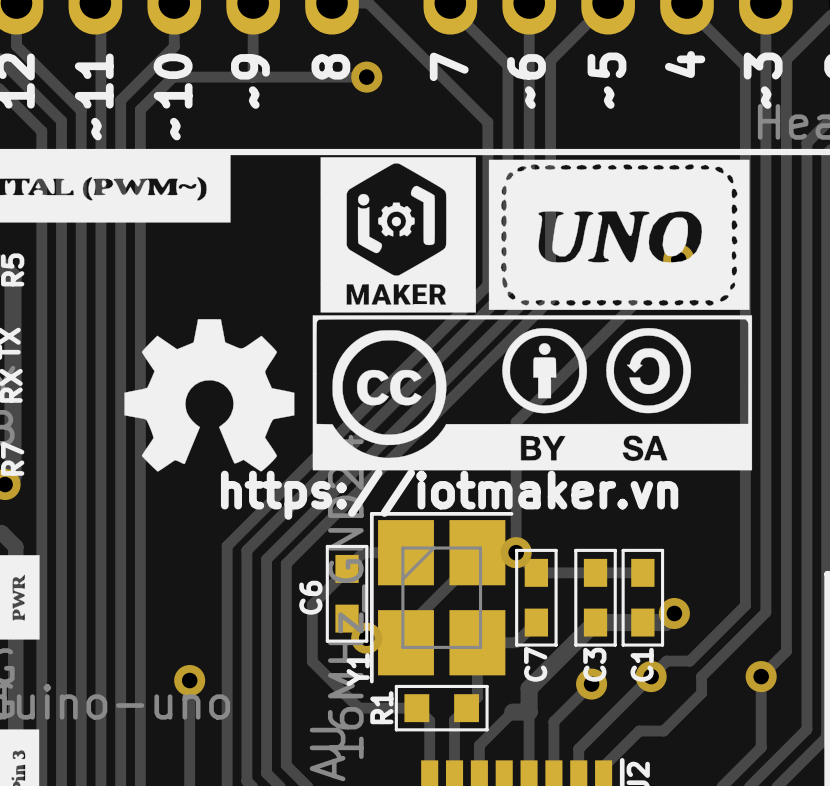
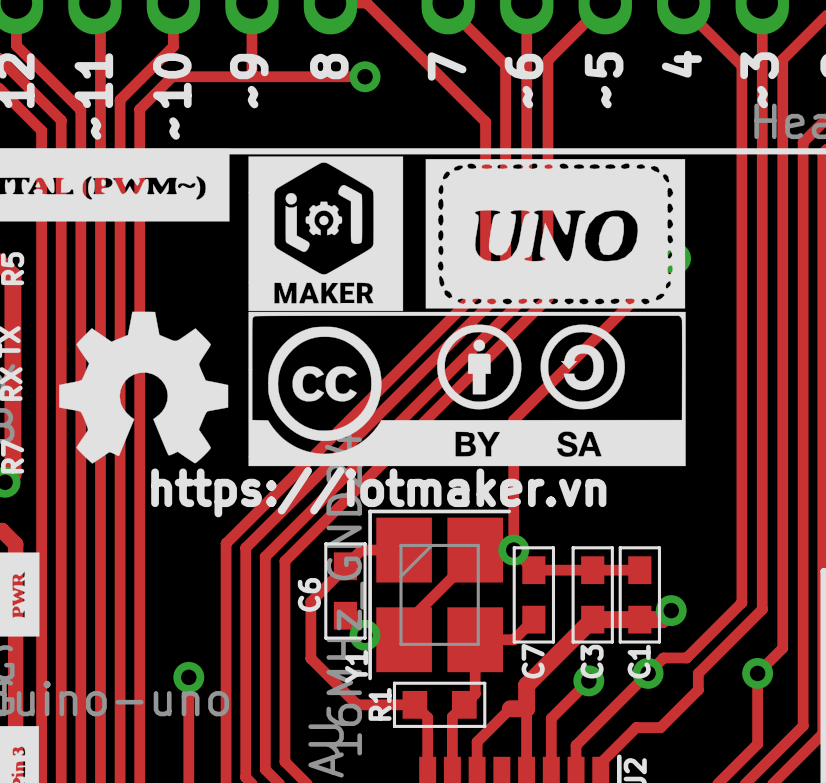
drawing position: (398, 234) -> (325, 233)
drawing position: (619, 234) -> (555, 233)
drawing position: (532, 392) -> (467, 388)
drawing position: (209, 395) -> (143, 387)
text position: https://iotmaker.vn (449, 494) -> https://iotmaker.vn (378, 492)

